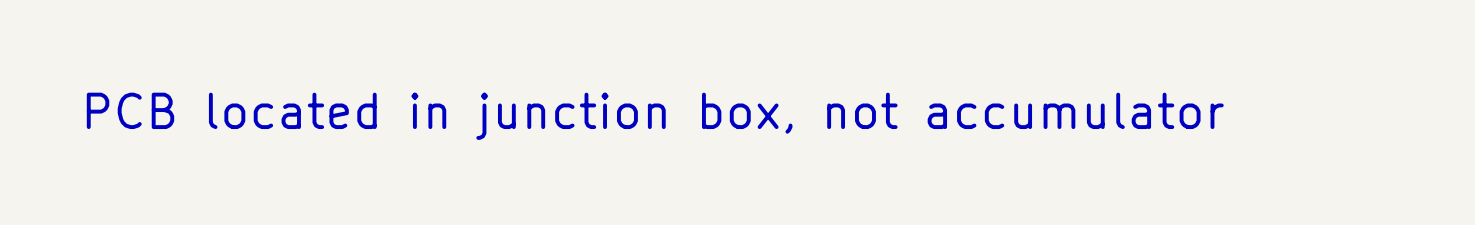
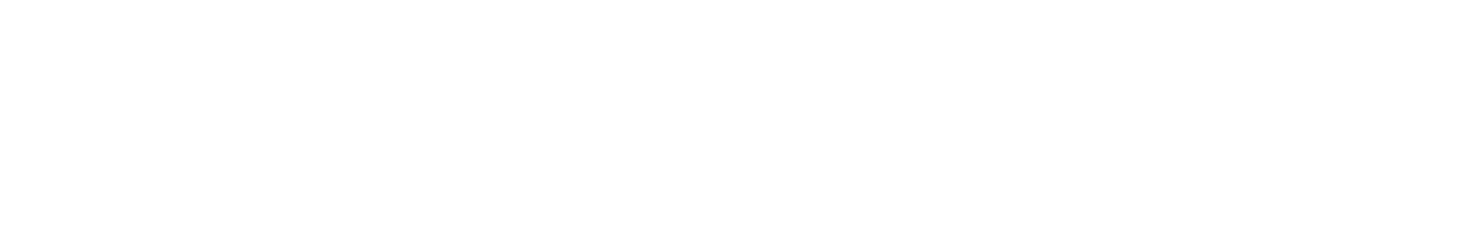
text: PCB located in junction box, not accumulator (655, 116) -> none

